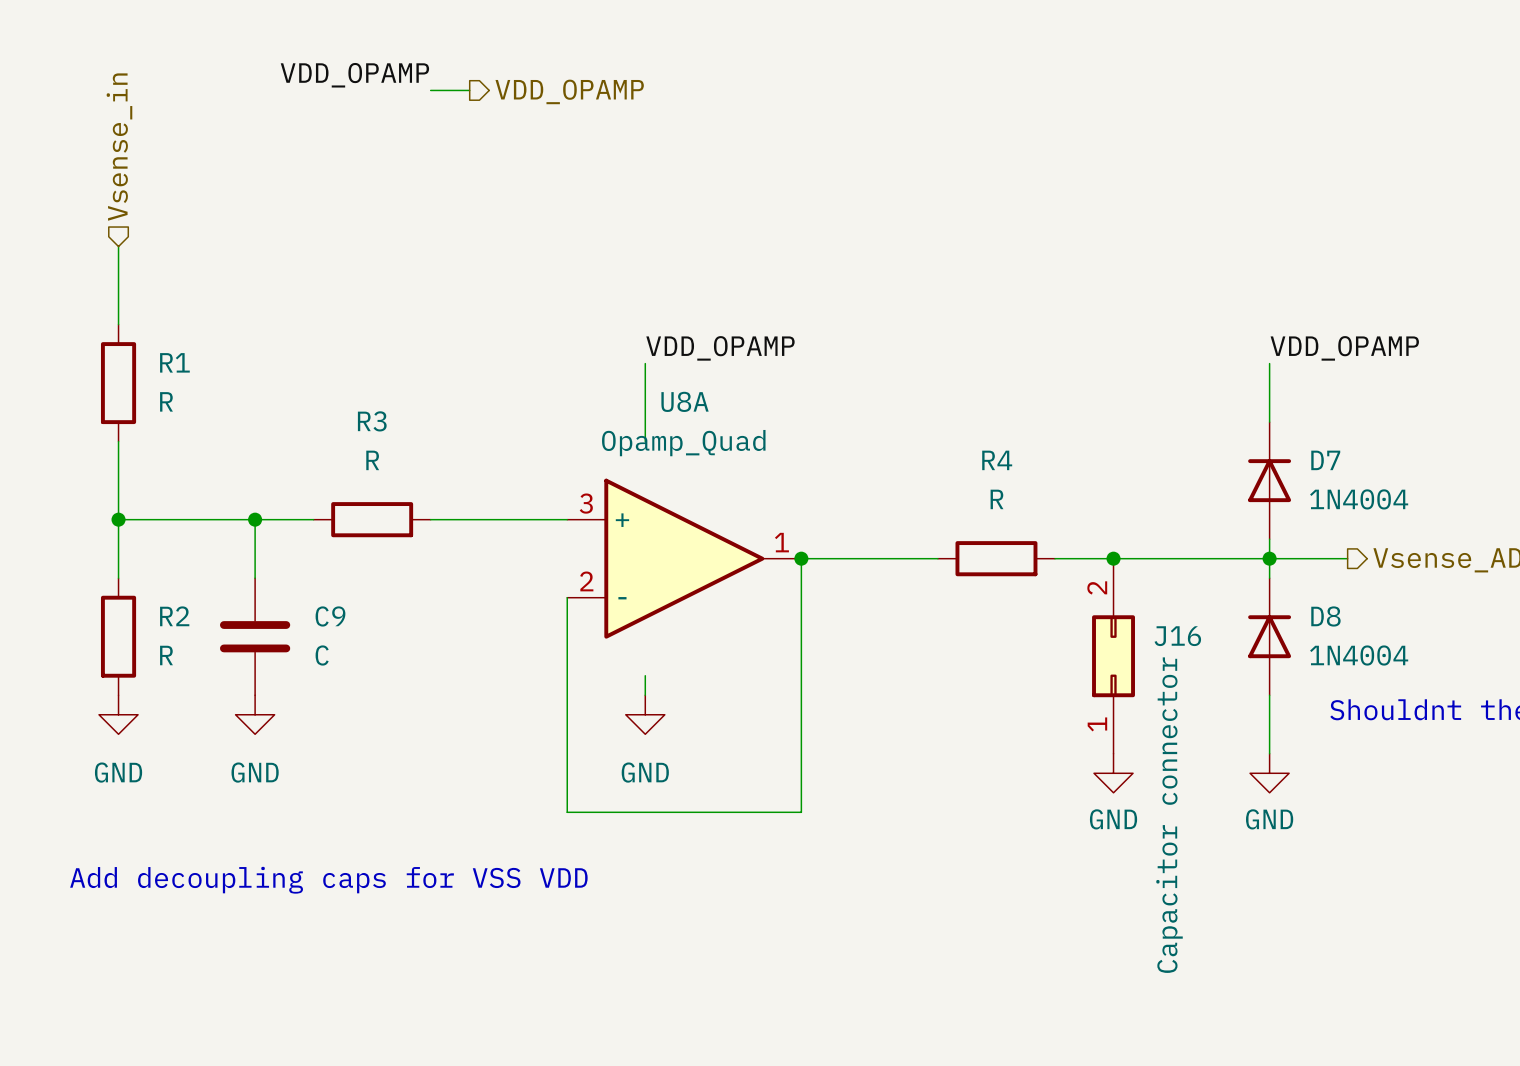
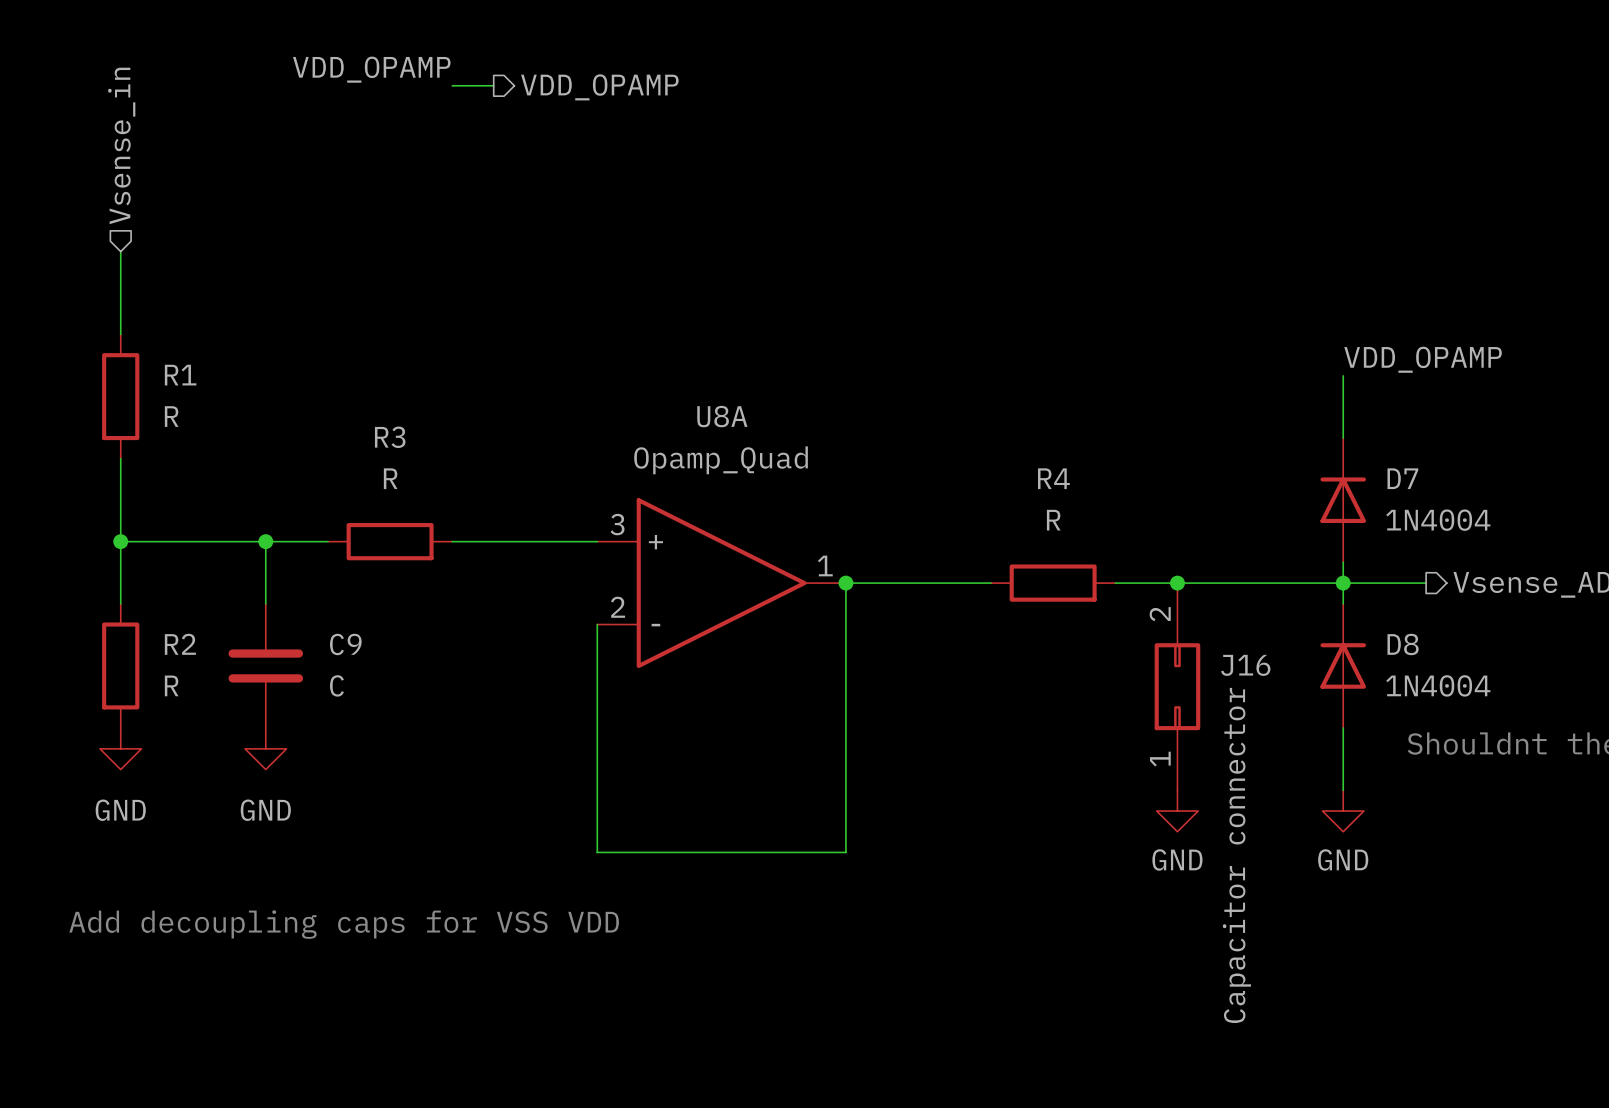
label: VDD_OPAMP (720, 348) -> none
wire: (645, 363) (645, 441) -> none
wire: (645, 675) (645, 695) -> none
power symbol: GND (645, 714) -> none

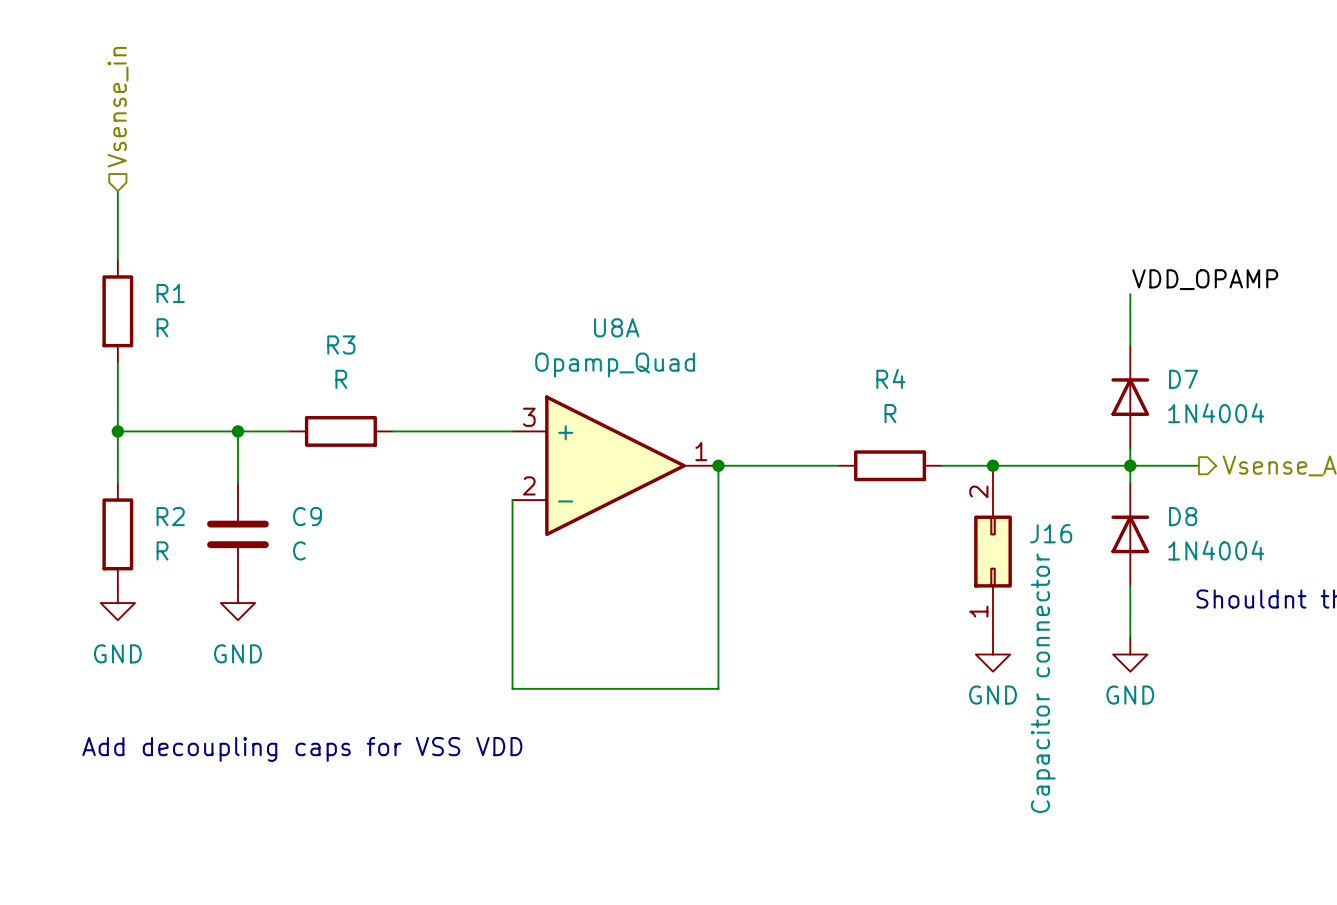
label: VDD_OPAMP (371, 69) -> none
wire: (452, 85) (493, 85) -> none
hierarchical label: VDD_OPAMP (599, 87) -> none

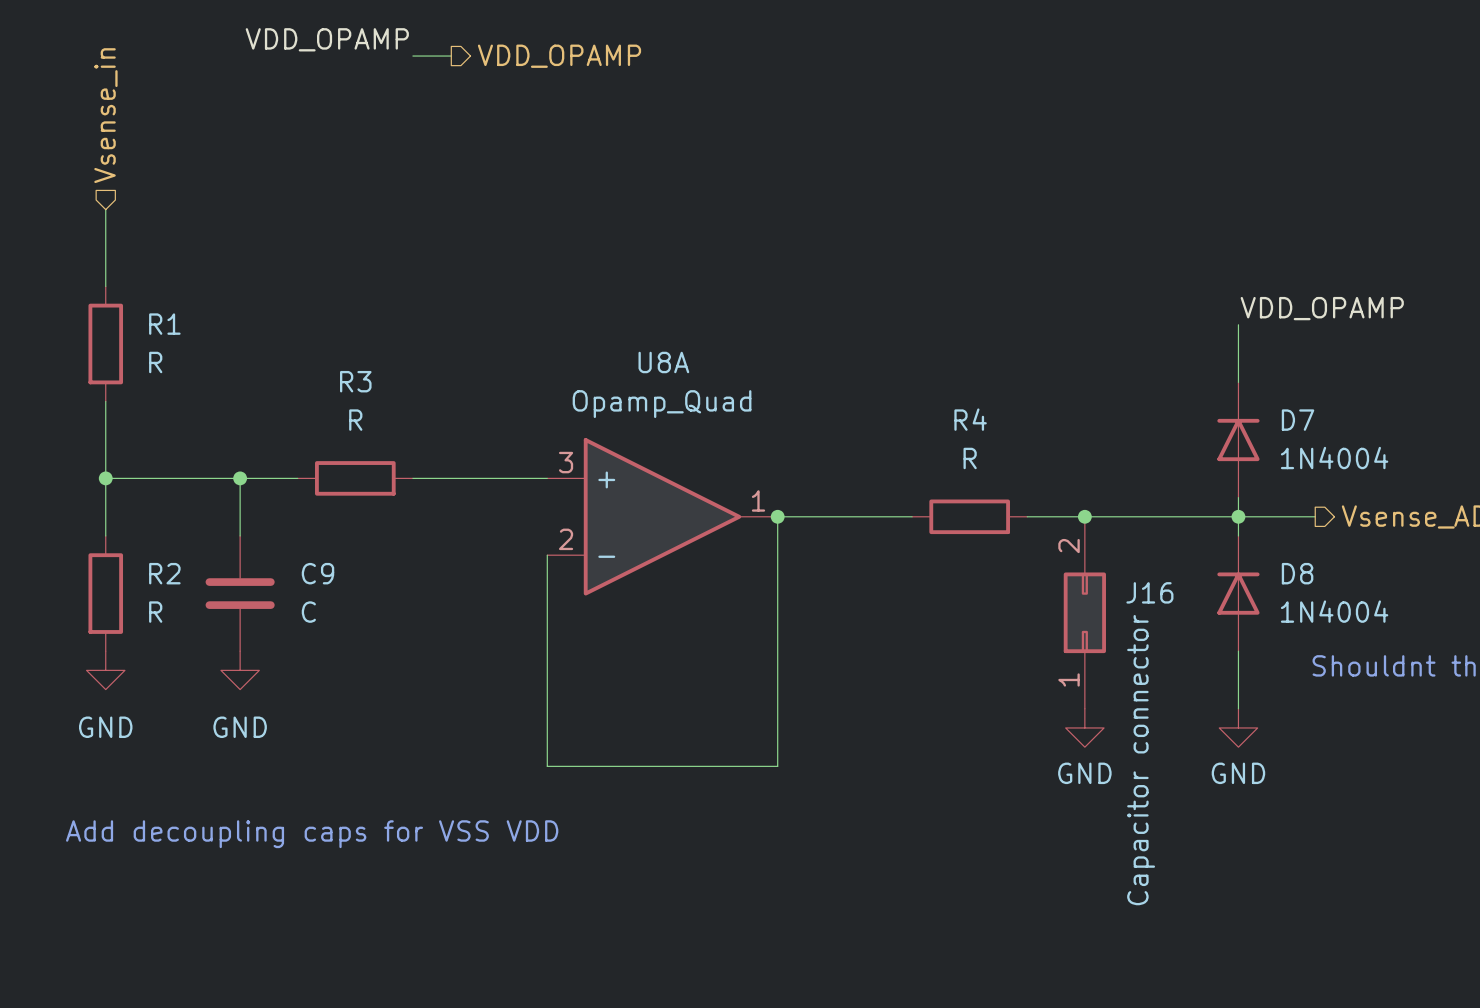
label: none -> VDD_OPAMP (327, 39)
wire: none -> (412, 56) (451, 56)
hierarchical label: none -> VDD_OPAMP (559, 56)

